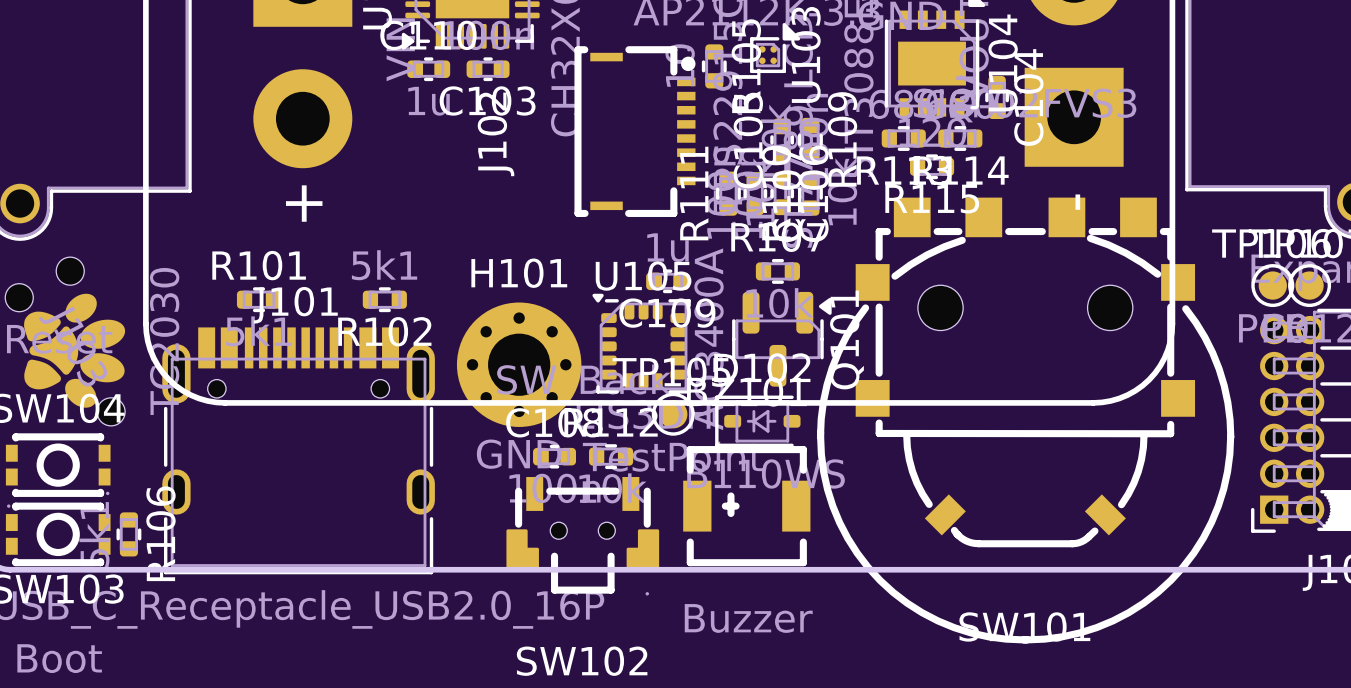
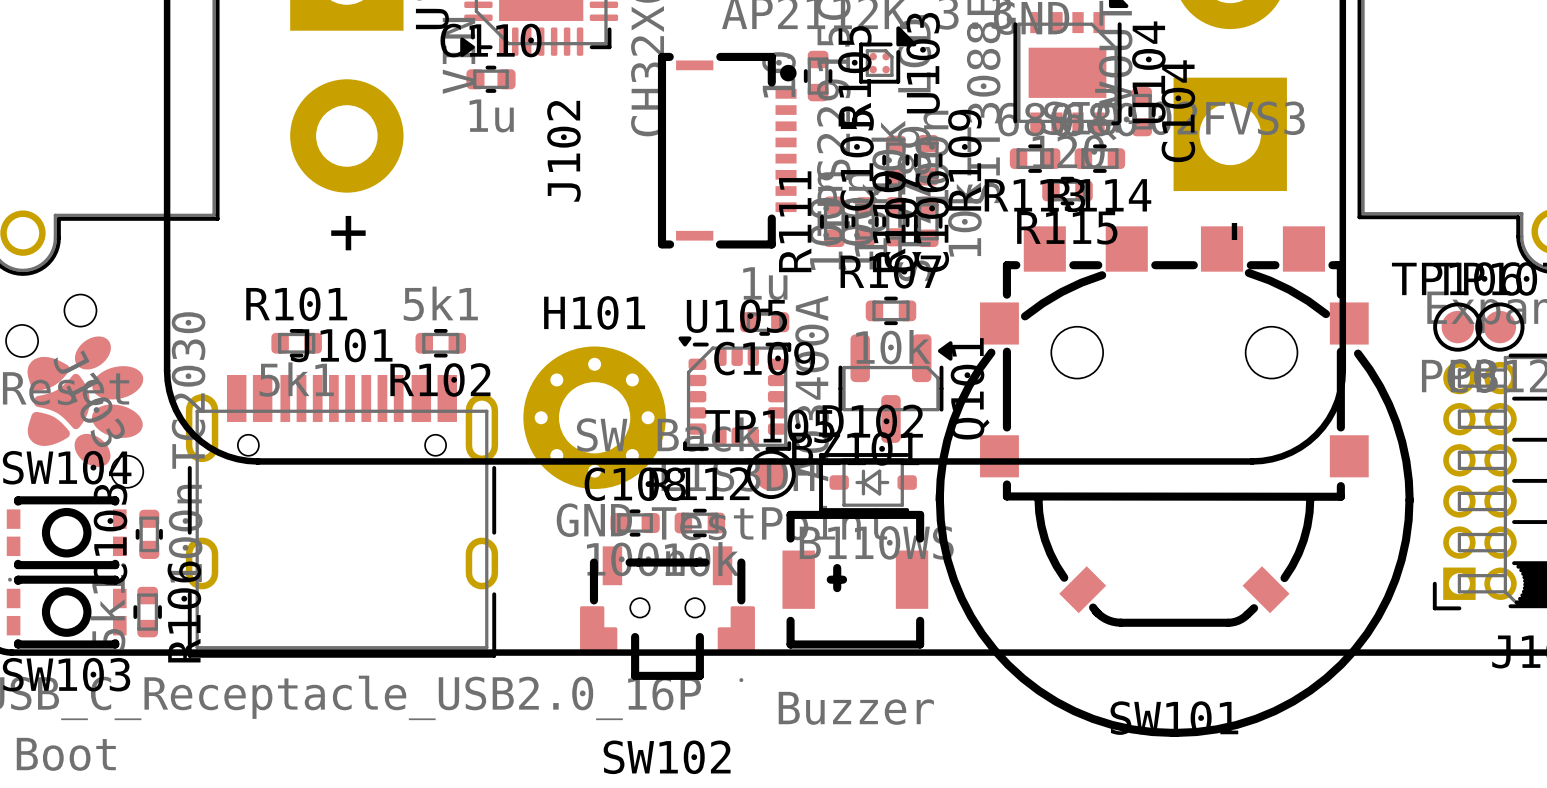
C103 rotation: 0° (488, 69) -> 90° clockwise (149, 534)
C103 position: (488, 69) -> (149, 534)

